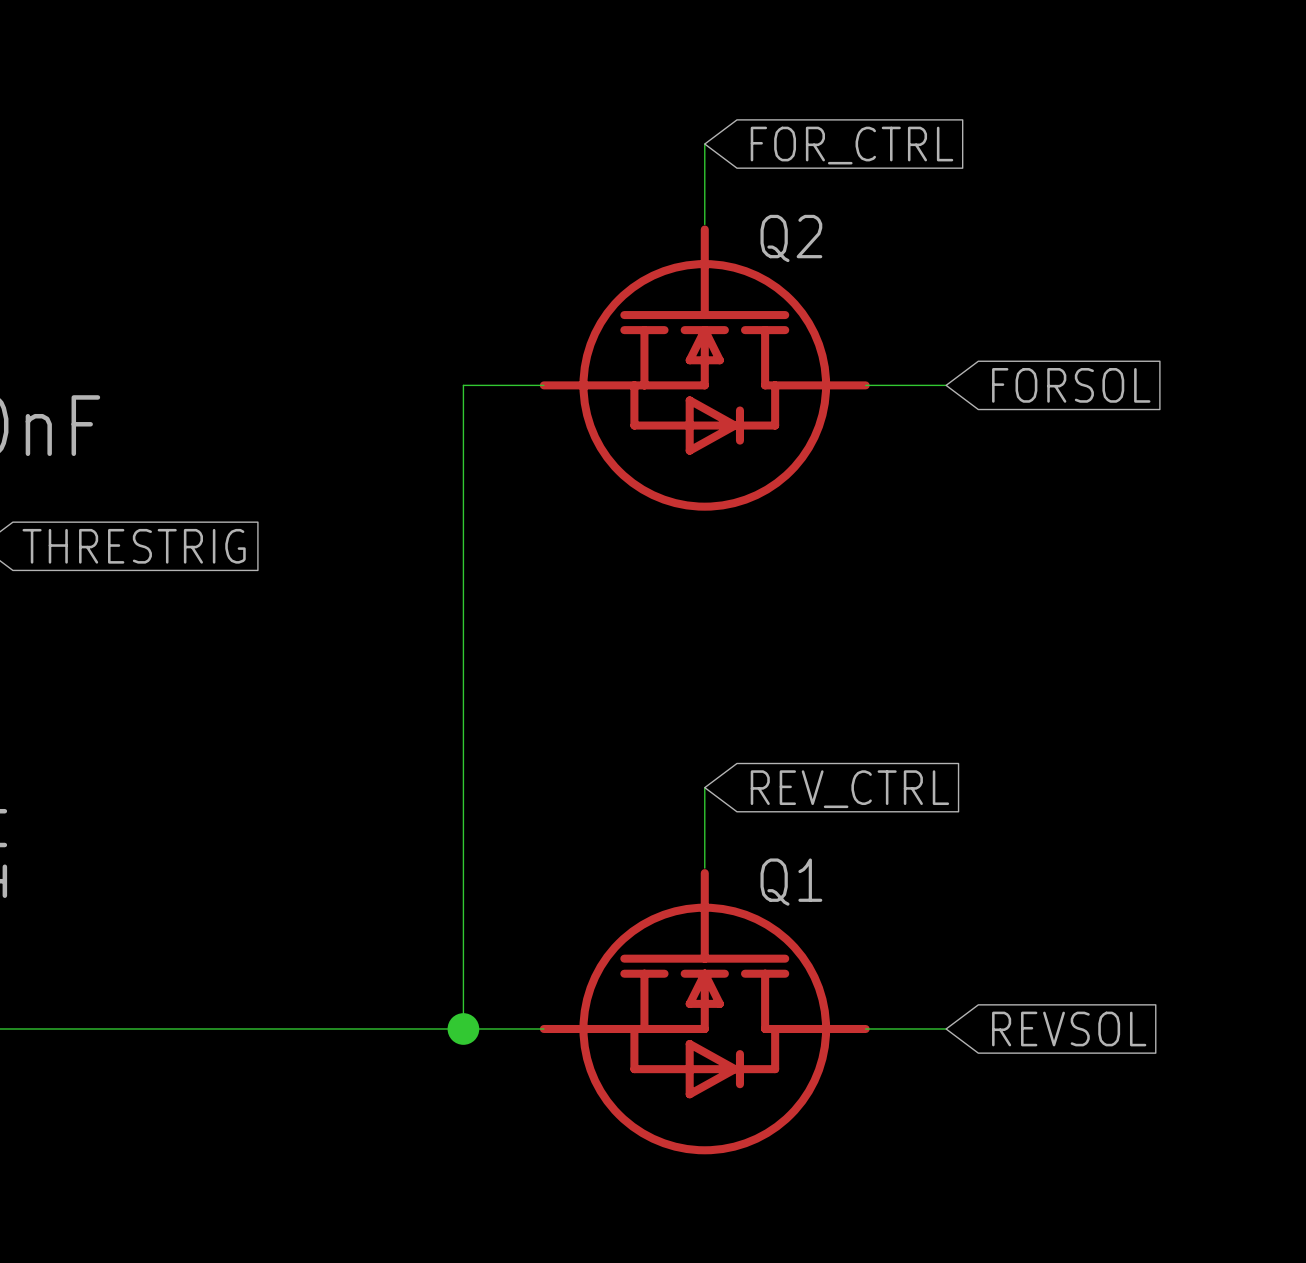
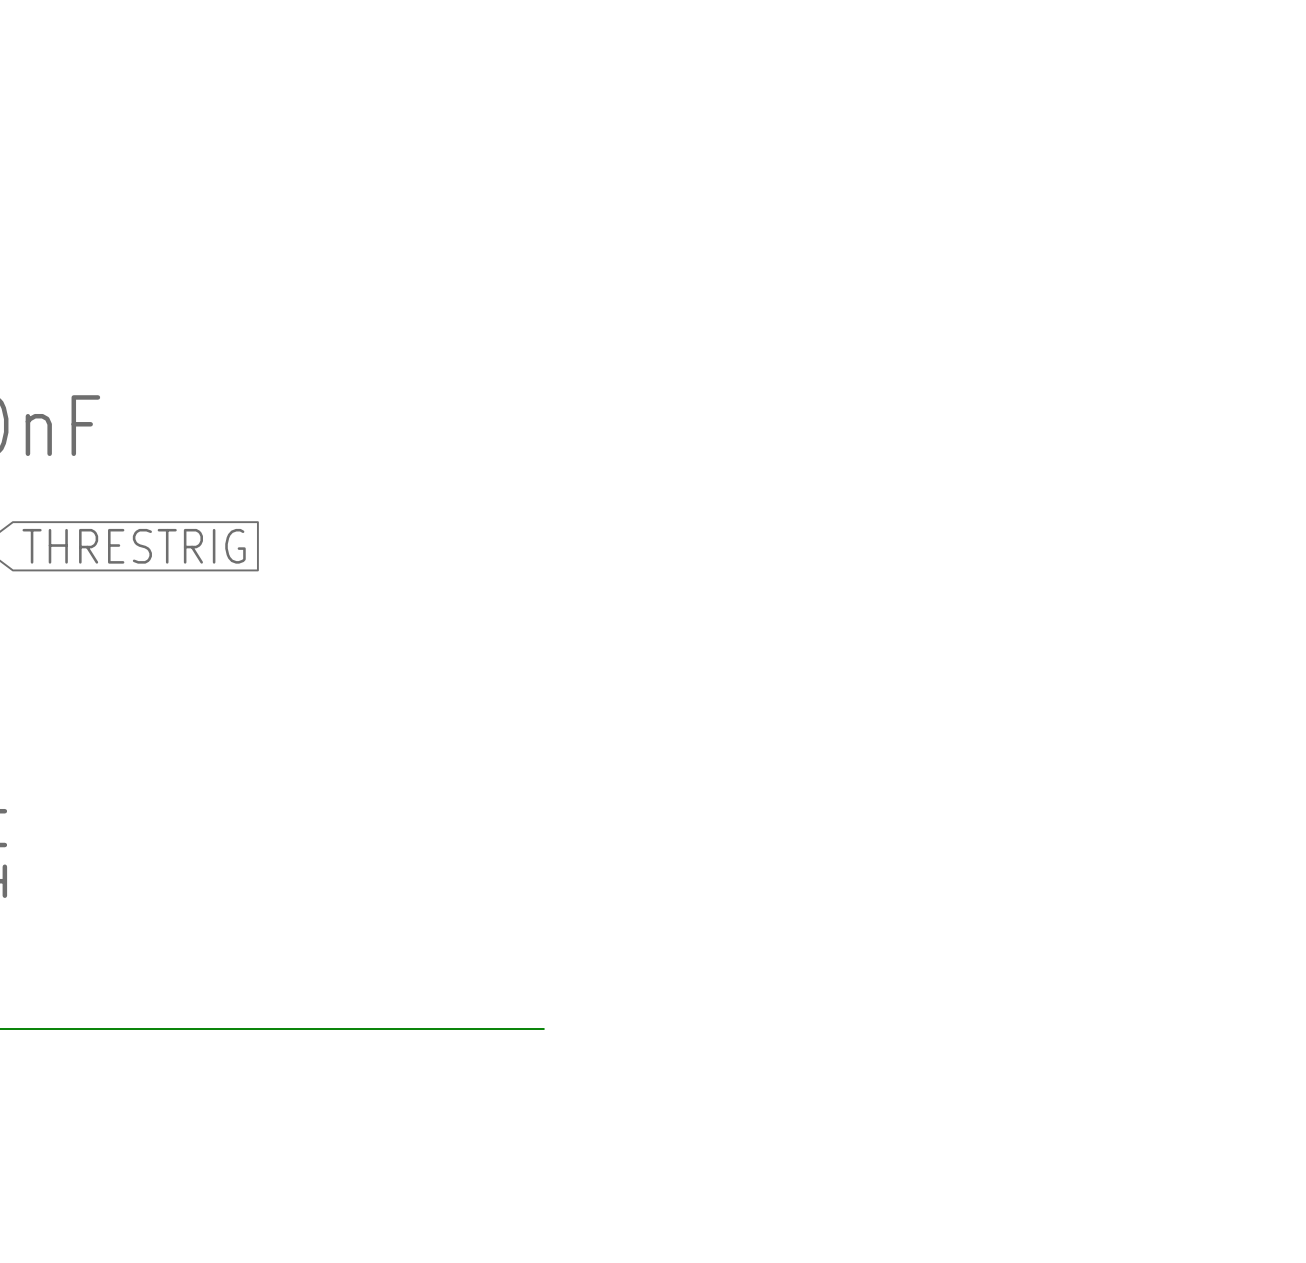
wire: (704, 144) (704, 224) -> none
global label: FOR_CTRL (851, 145) -> none
Q2: (704, 368) -> none
wire: (543, 385) (463, 385) (463, 1028) -> none
wire: (865, 385) (946, 385) -> none
global label: FORSOL (1071, 385) -> none
wire: (704, 787) (704, 868) -> none
global label: REV_CTRL (849, 789) -> none
Q1: (704, 1011) -> none
junction: (463, 1028) -> none
wire: (865, 1028) (946, 1028) -> none
global label: REVSOL (1069, 1028) -> none

